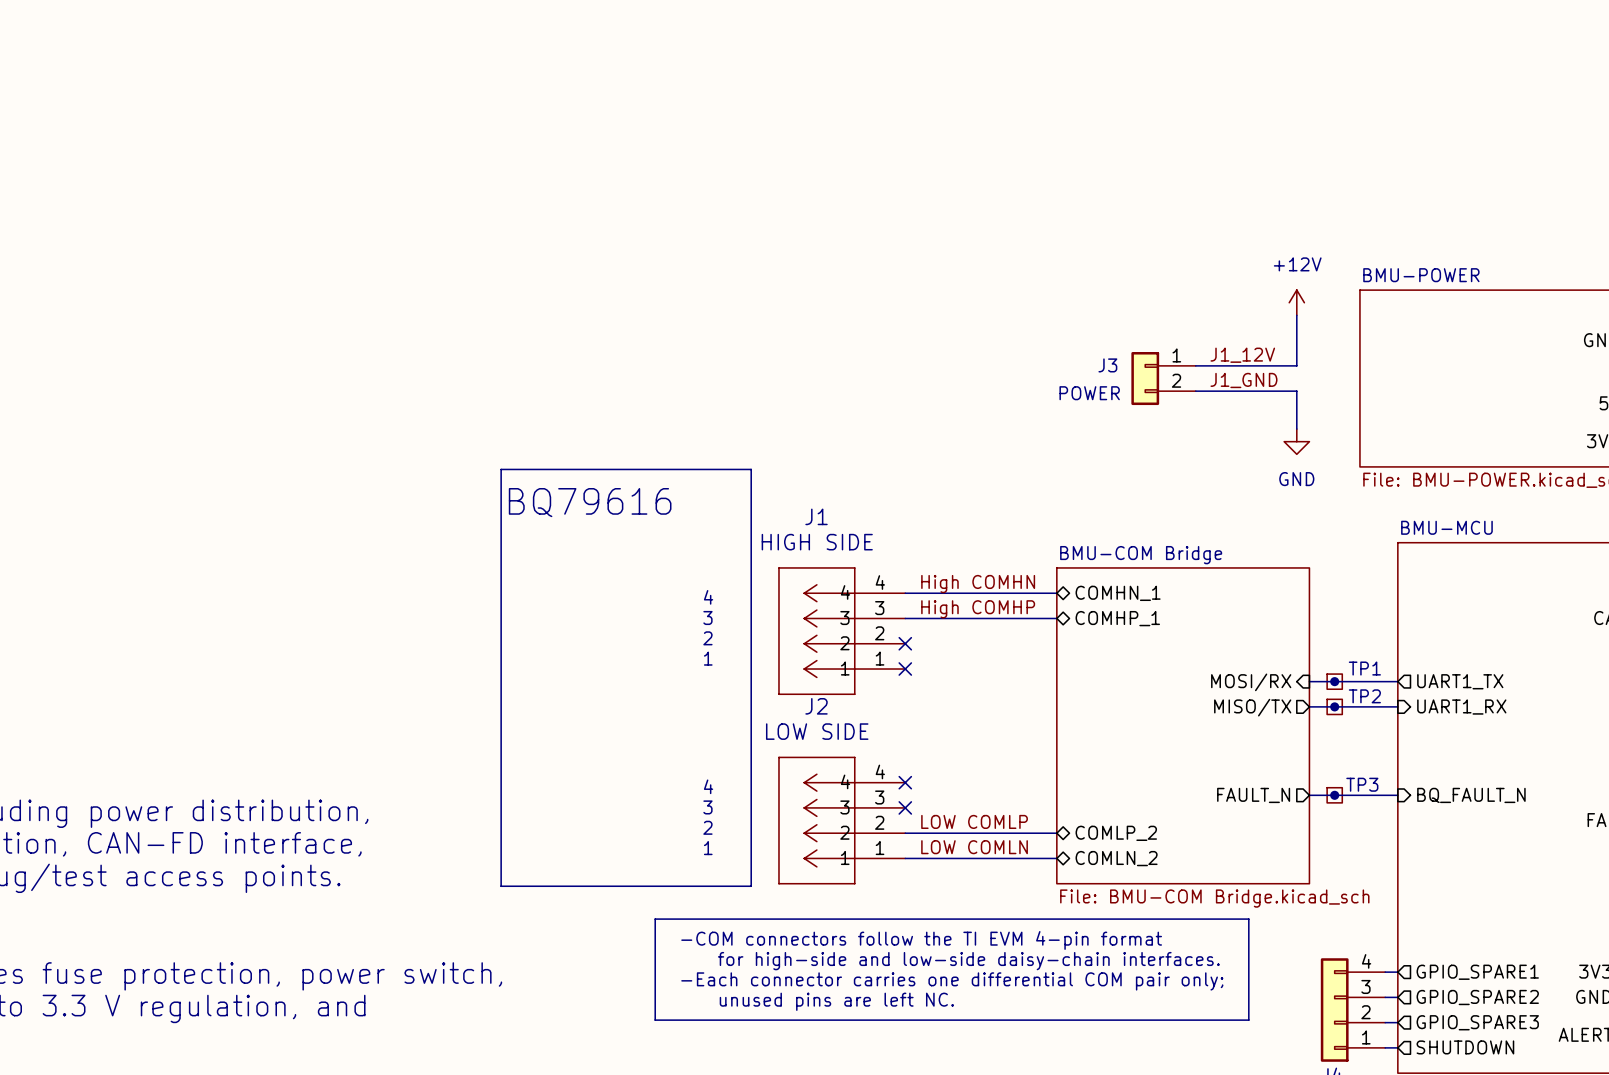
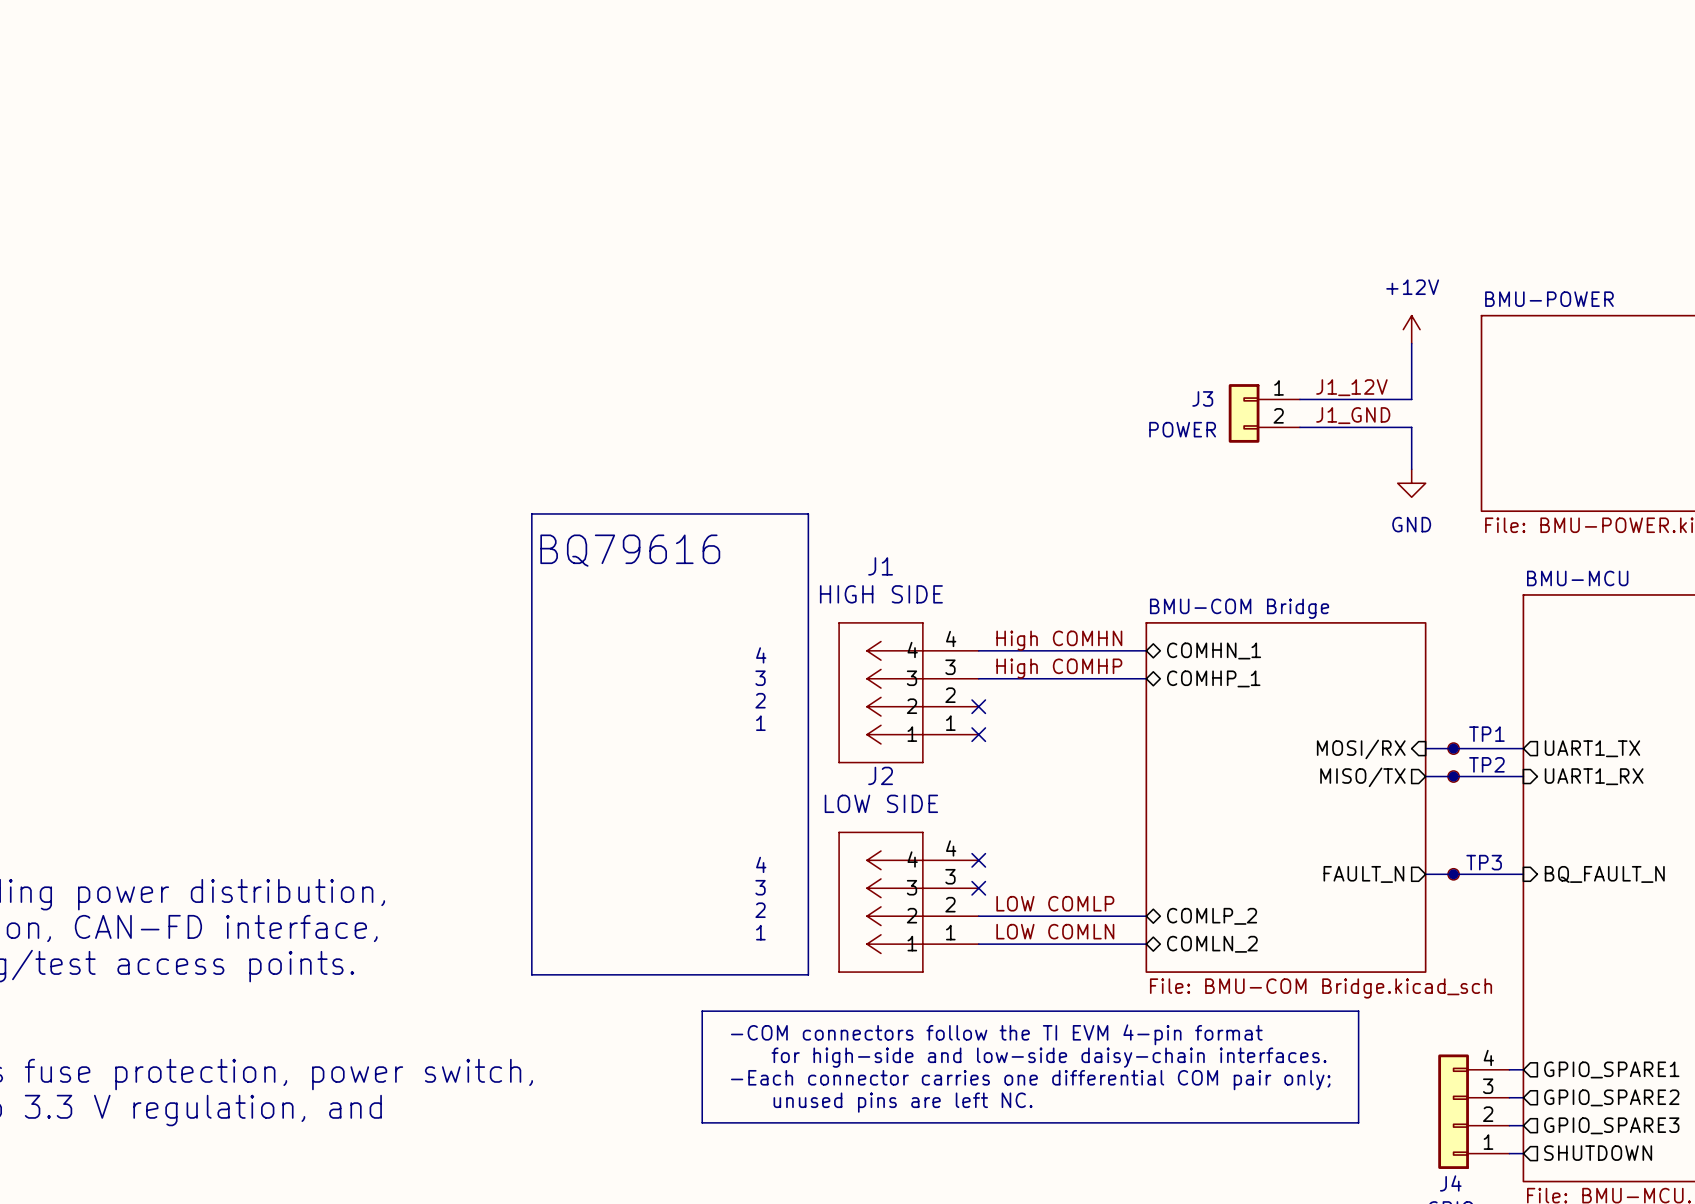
TP1 symbol: [1327, 674, 1343, 690] -> [1447, 743, 1460, 755]
TP2 symbol: [1327, 699, 1343, 715] -> [1447, 770, 1460, 783]
TP3 symbol: [1327, 787, 1343, 803] -> [1447, 868, 1460, 880]

